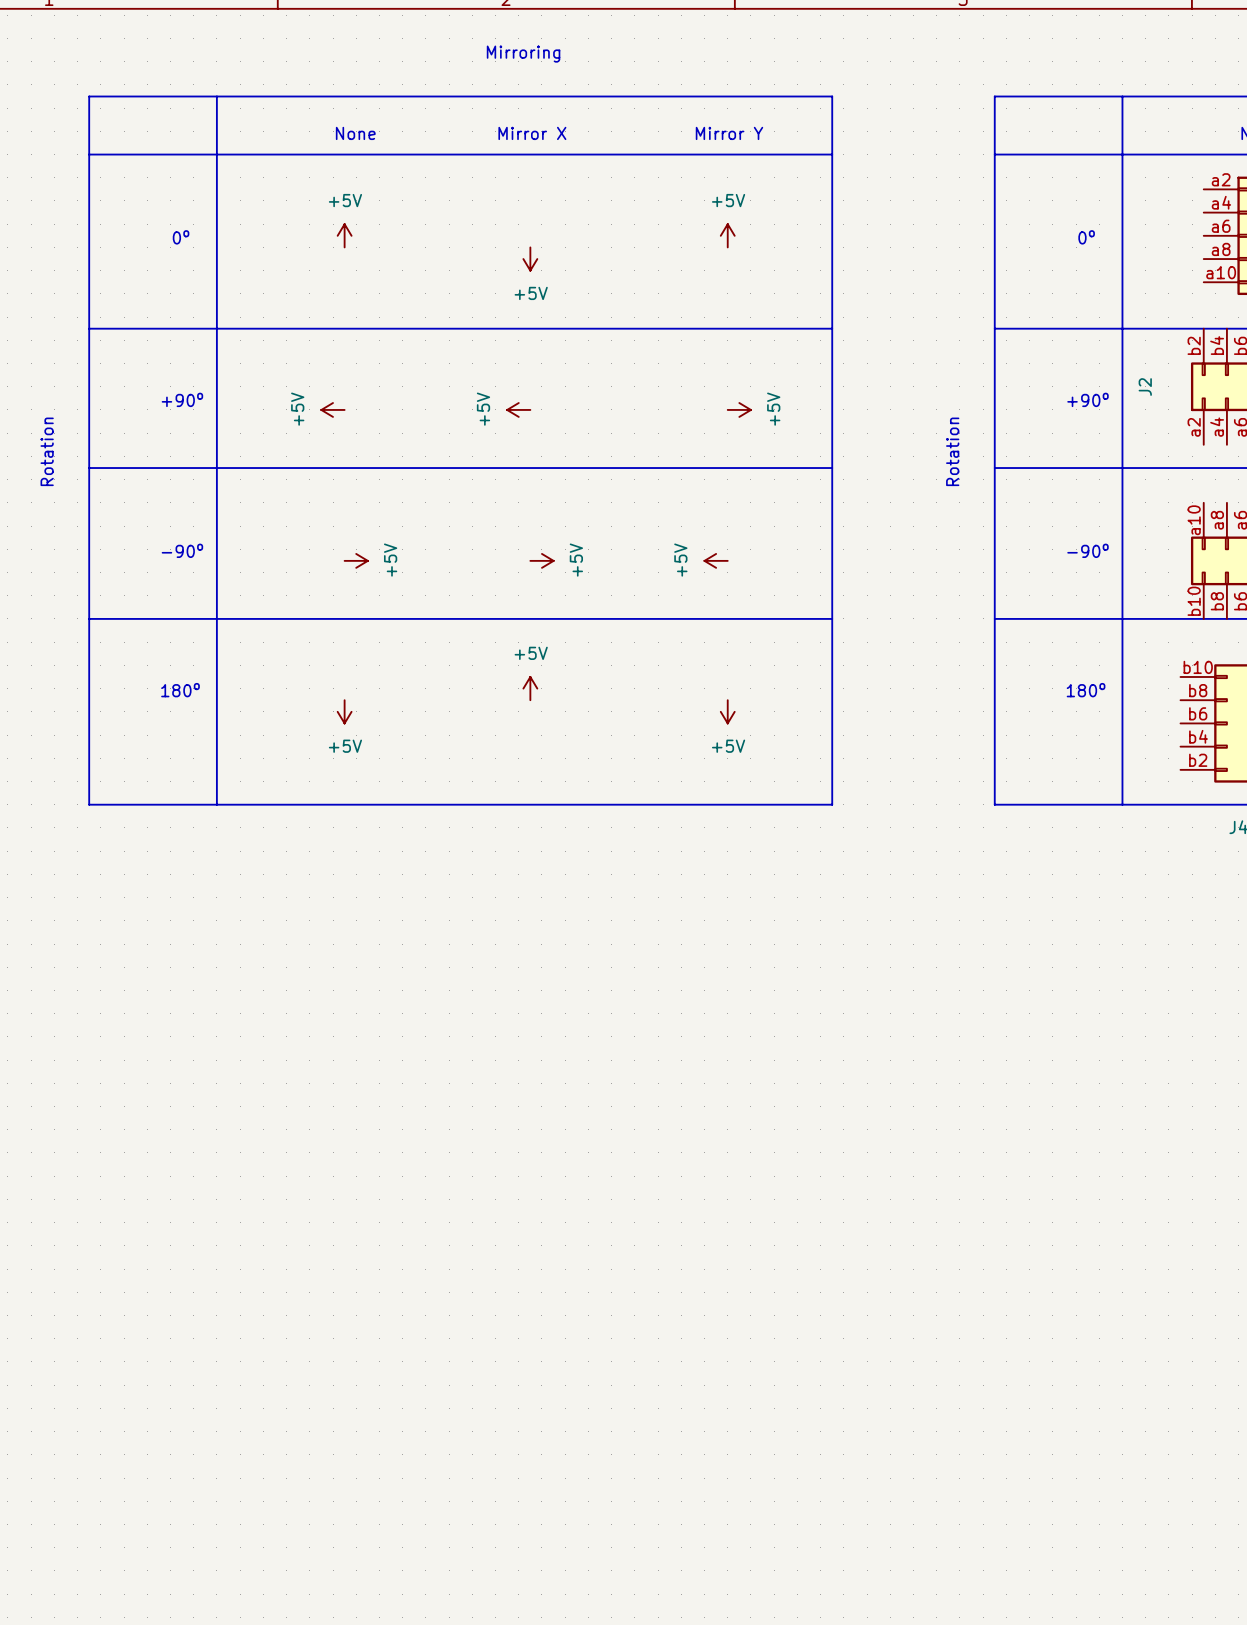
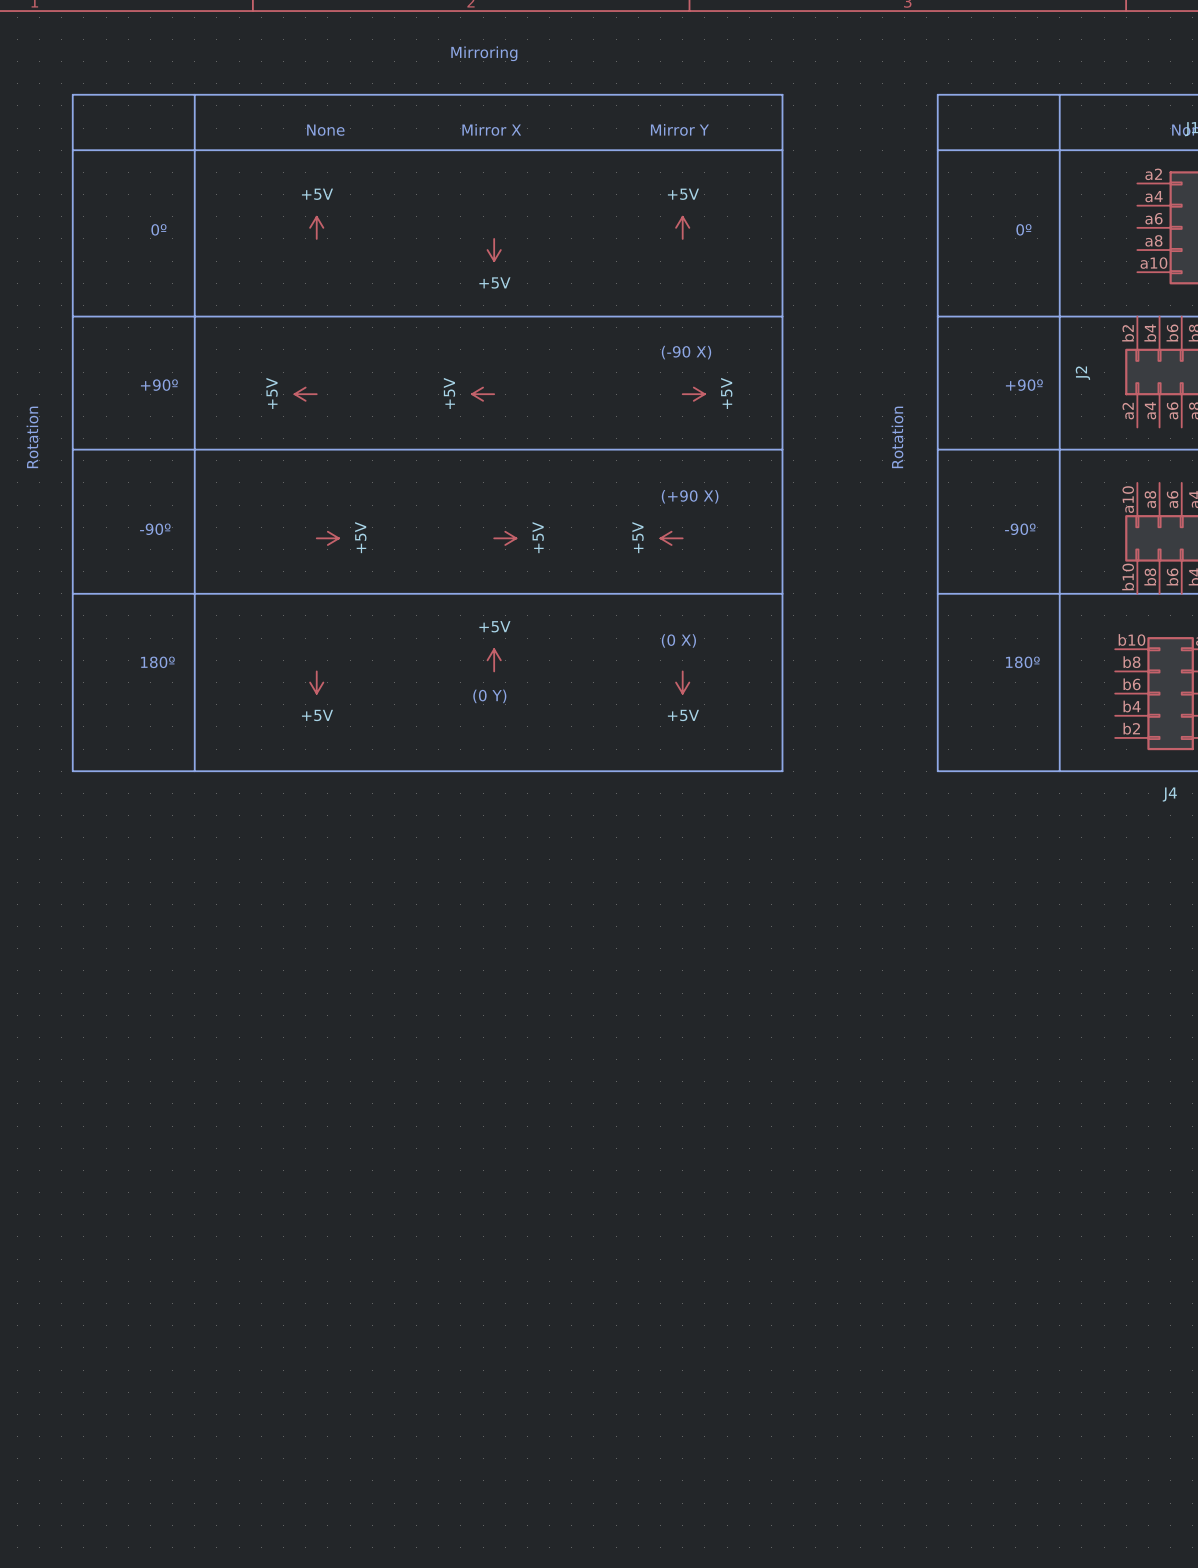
text: none -> (-90 X) (686, 352)
text: none -> (+90 X) (690, 496)
text: none -> (0 X) (678, 640)
text: none -> (0 Y) (489, 696)

